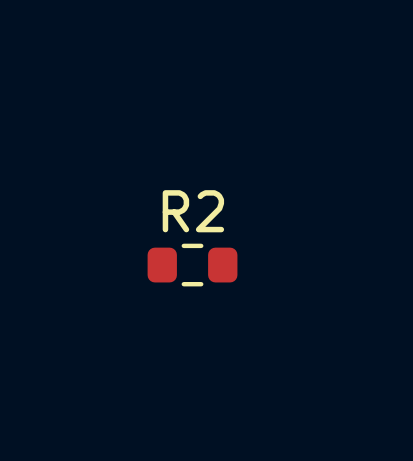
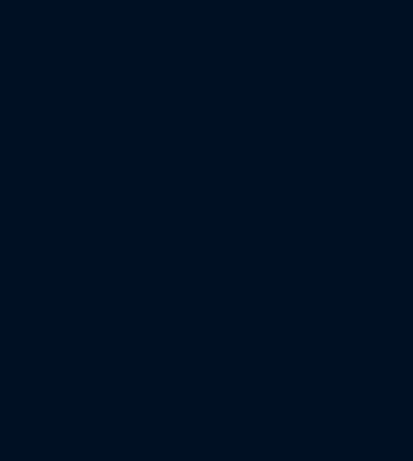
R2: (192, 265) -> none

